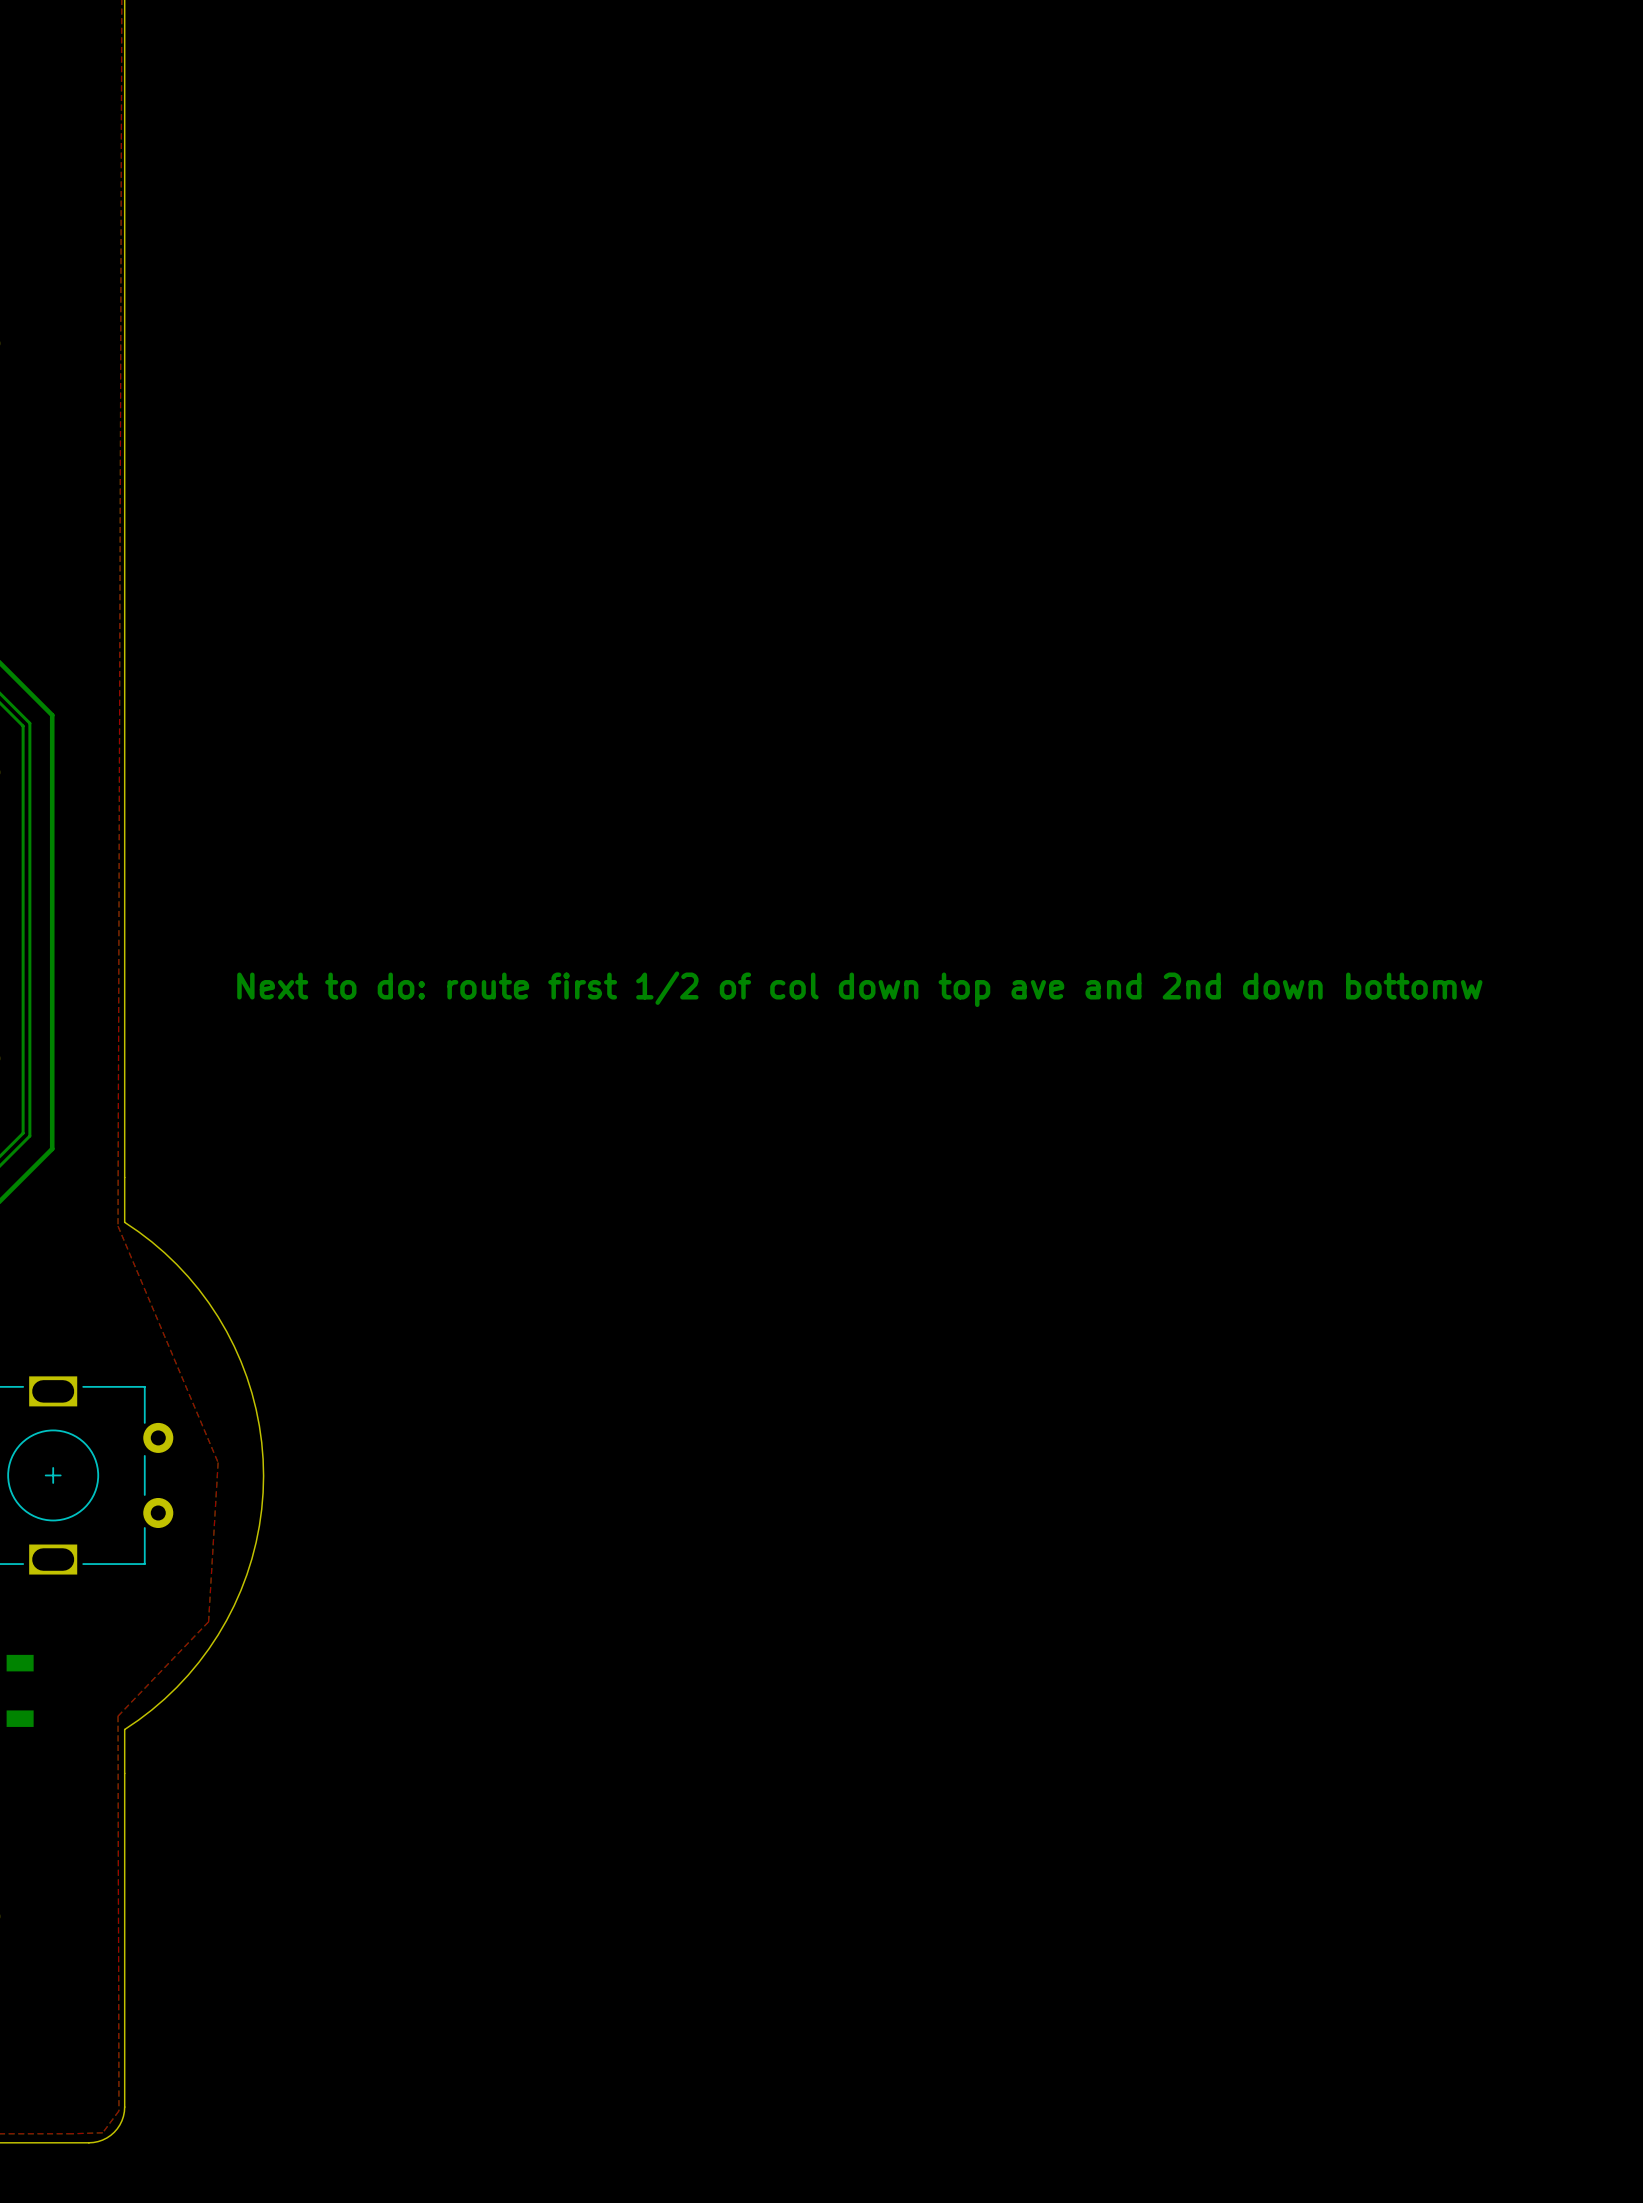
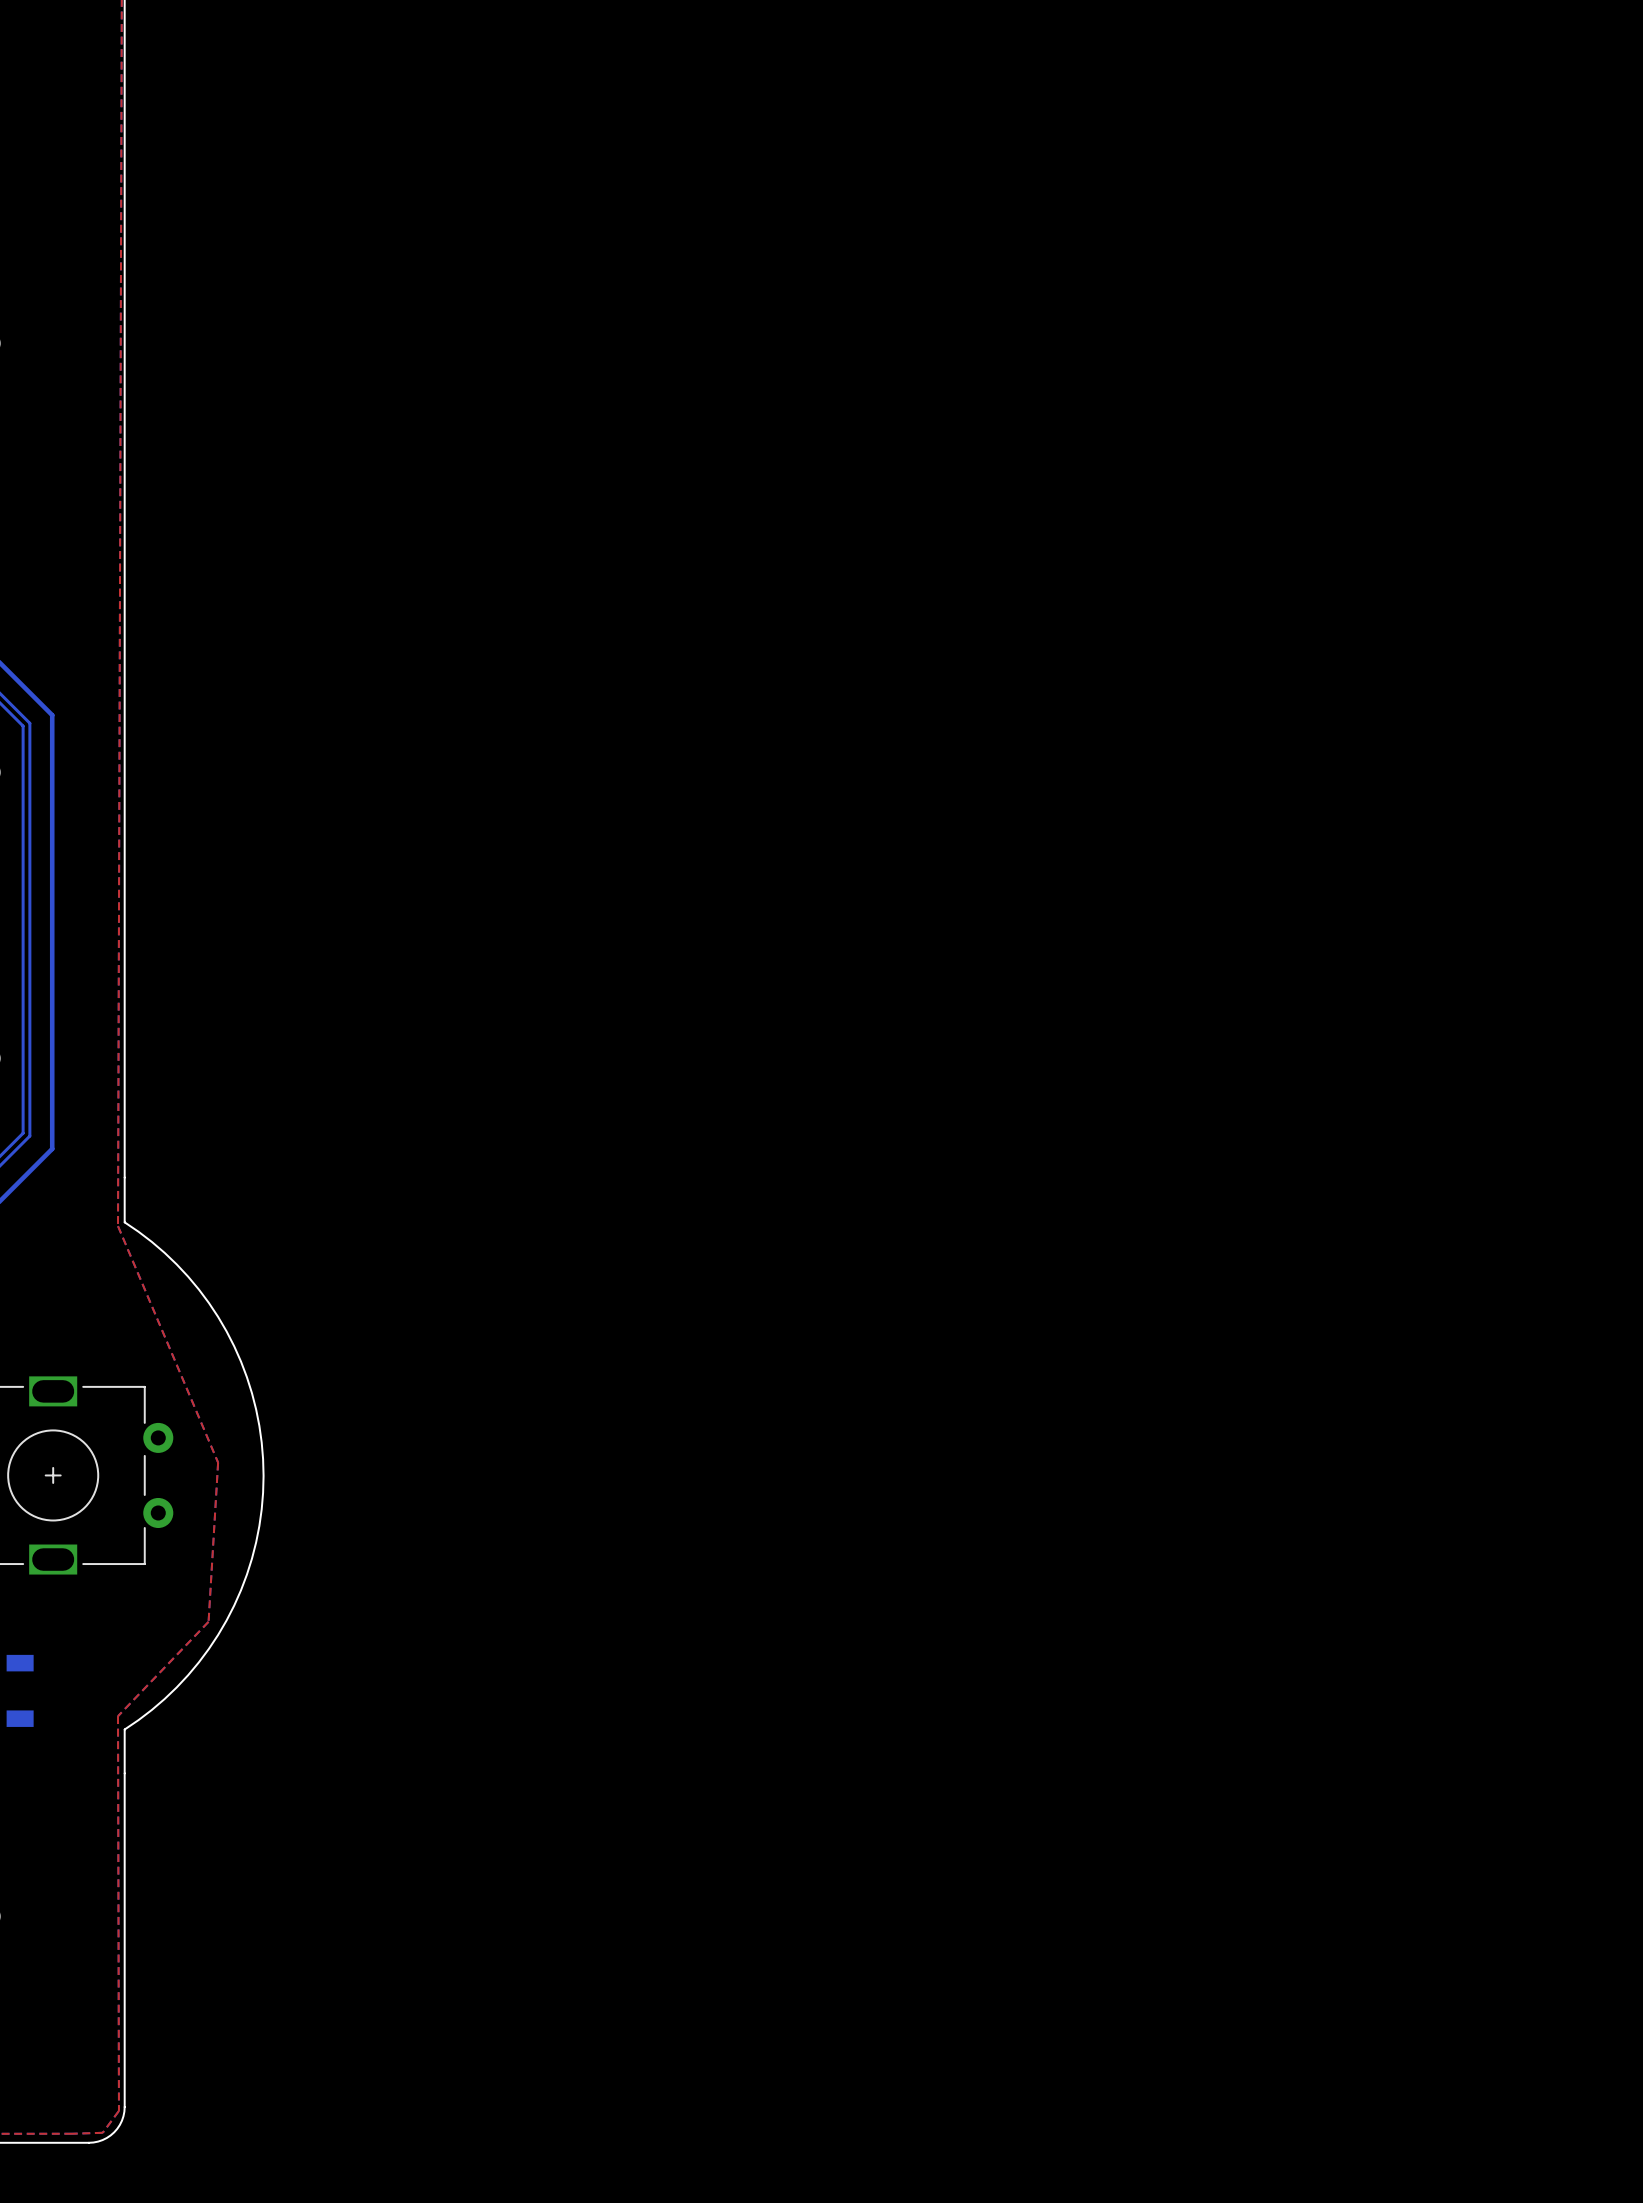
text: Next to do: route first 1/2 of col down top ave and 2nd down bottomw (859, 989) -> none

